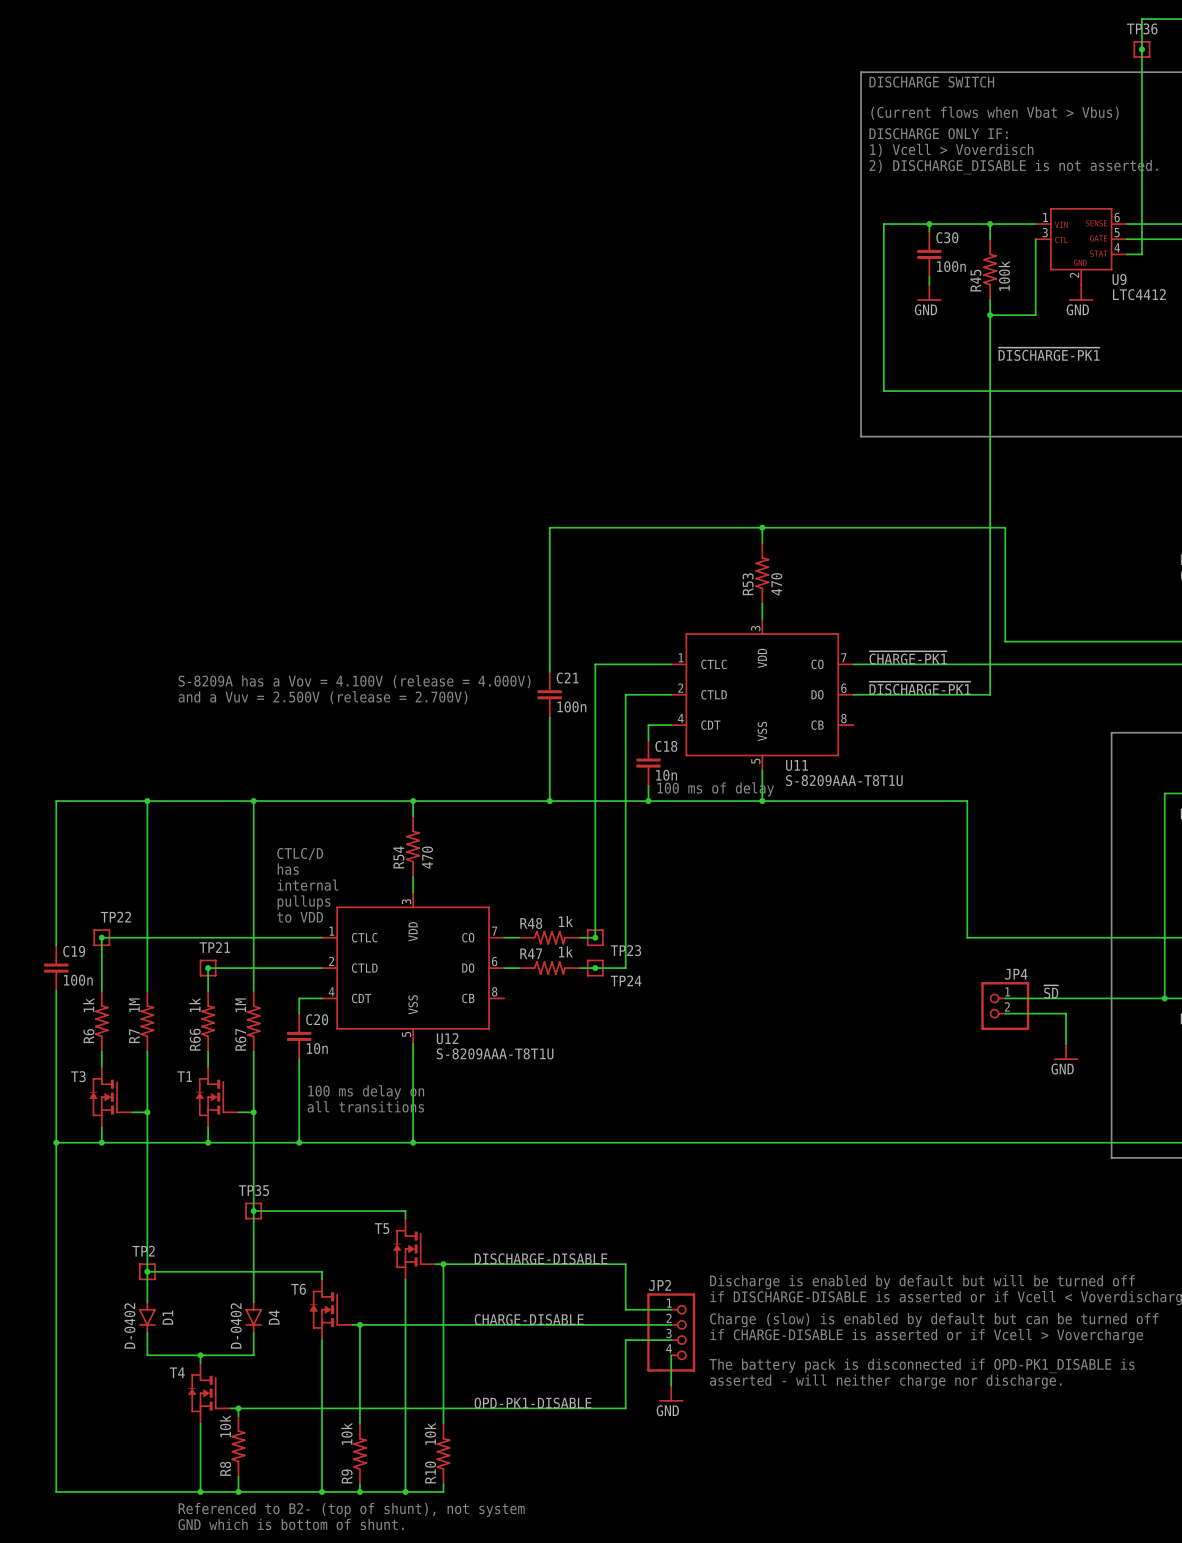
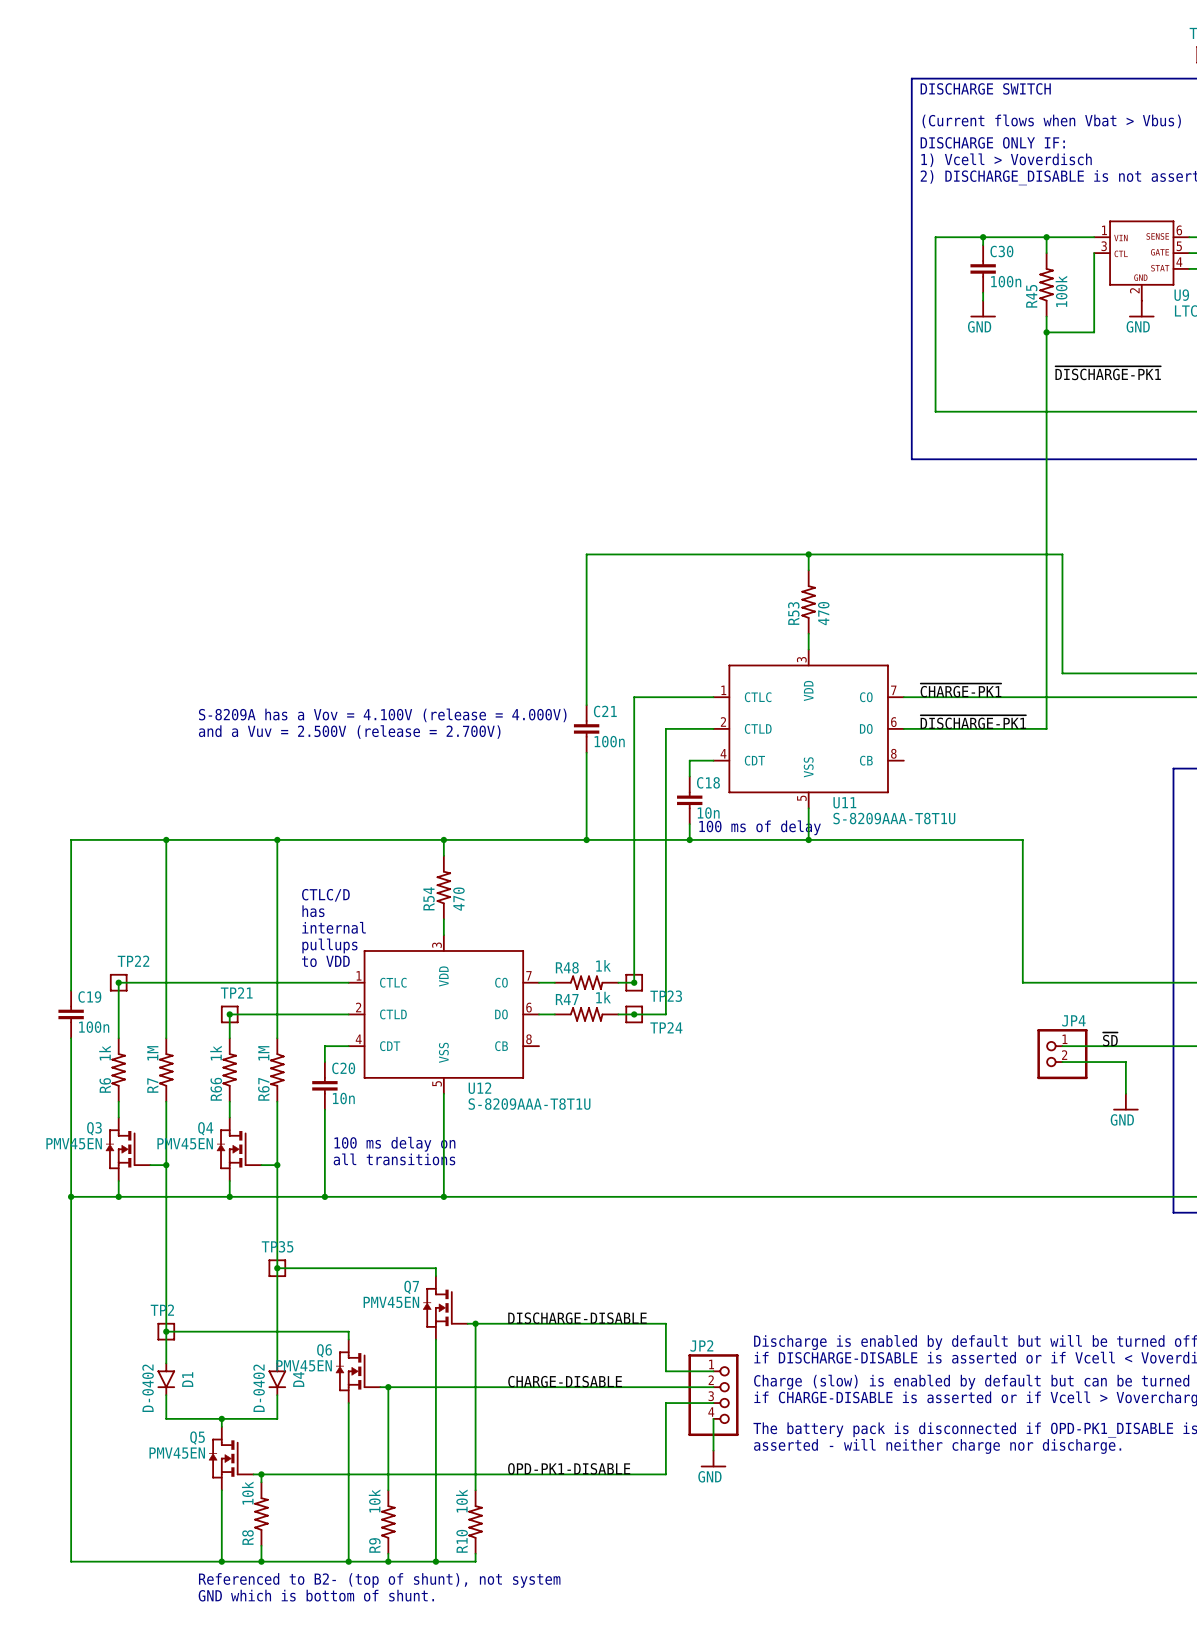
T3 name: T3 (78, 1076) -> Q3 (94, 1128)
T1 name: T1 (184, 1076) -> Q4 (205, 1128)
T3 value: none -> PMV45EN (74, 1143)
T1 value: none -> PMV45EN (185, 1143)
T5 name: T5 (382, 1228) -> Q7 (411, 1287)
T5 value: none -> PMV45EN (391, 1302)
T6 name: T6 (298, 1289) -> Q6 (324, 1350)
T6 value: none -> PMV45EN (304, 1365)
T4 name: T4 (177, 1372) -> Q5 (197, 1438)
T4 value: none -> PMV45EN (177, 1453)

